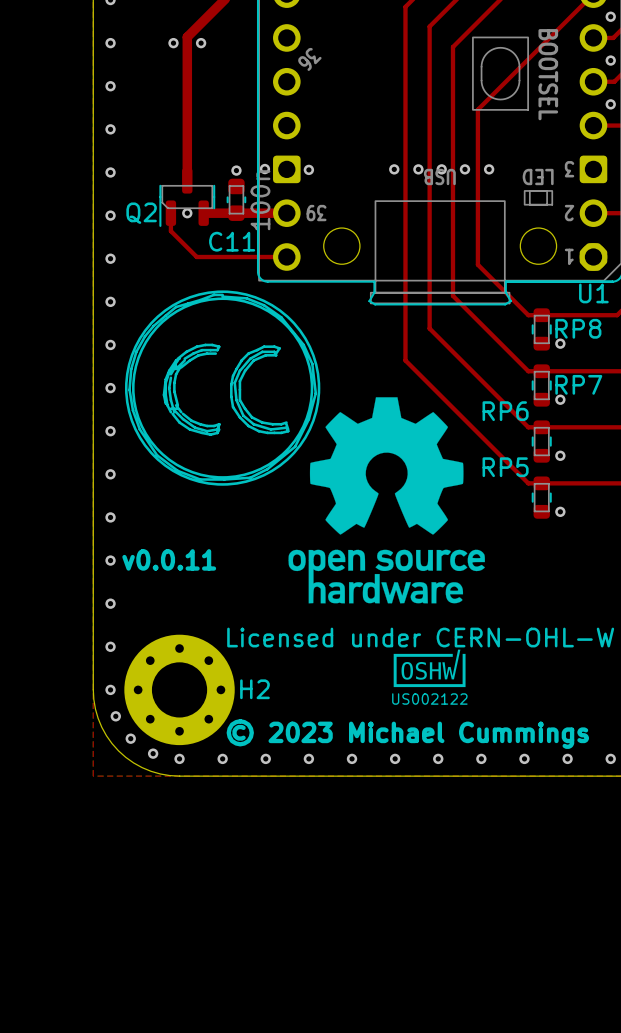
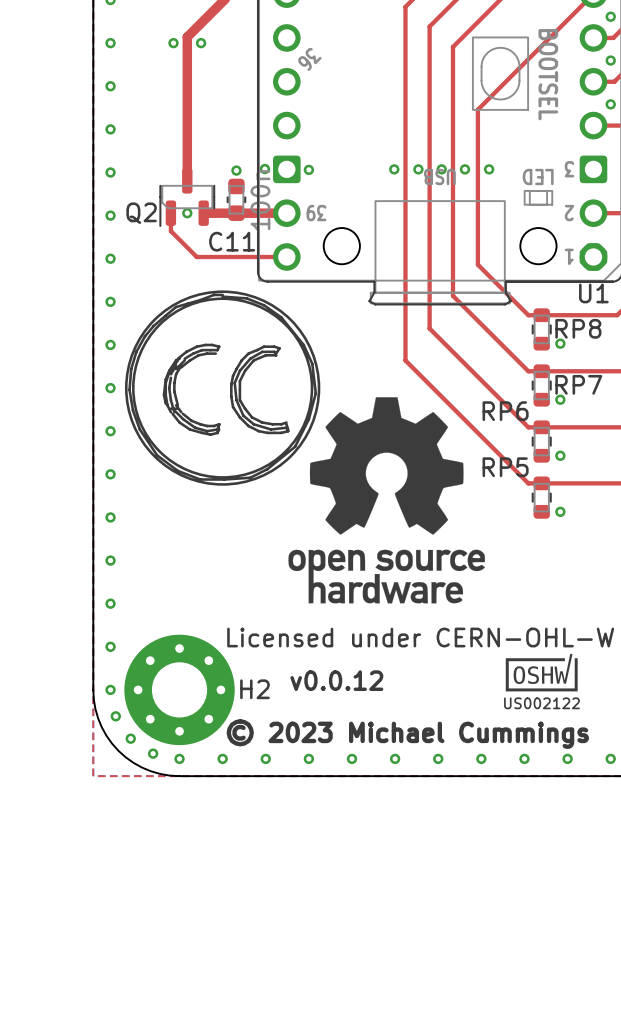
text: v0.0.11 (169, 559) -> none
drawing position: (429, 668) -> (541, 672)
text: none -> v0.0.12 (336, 680)

